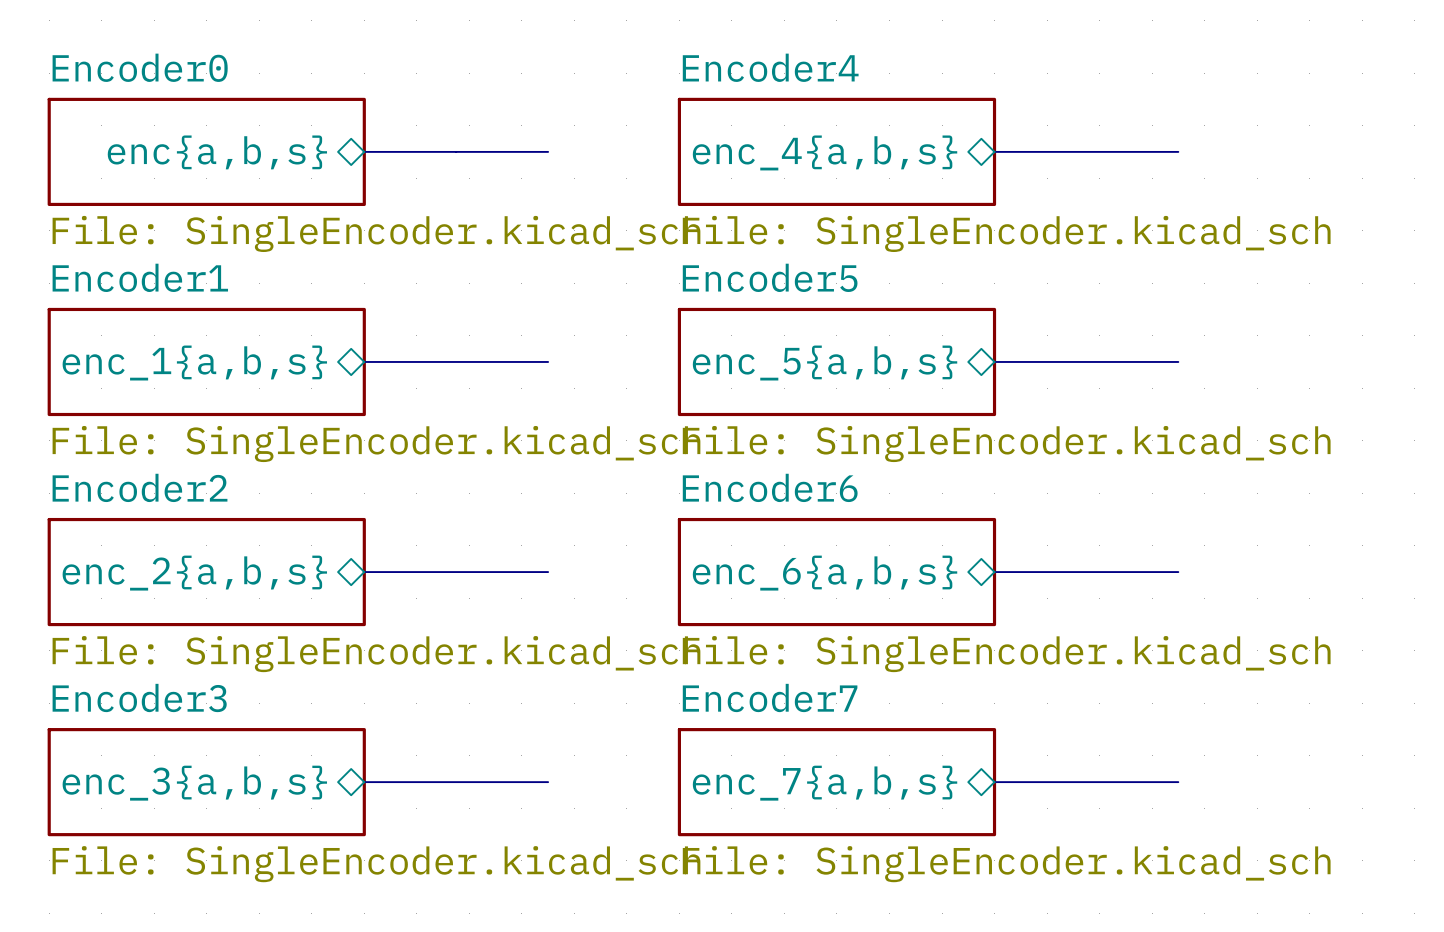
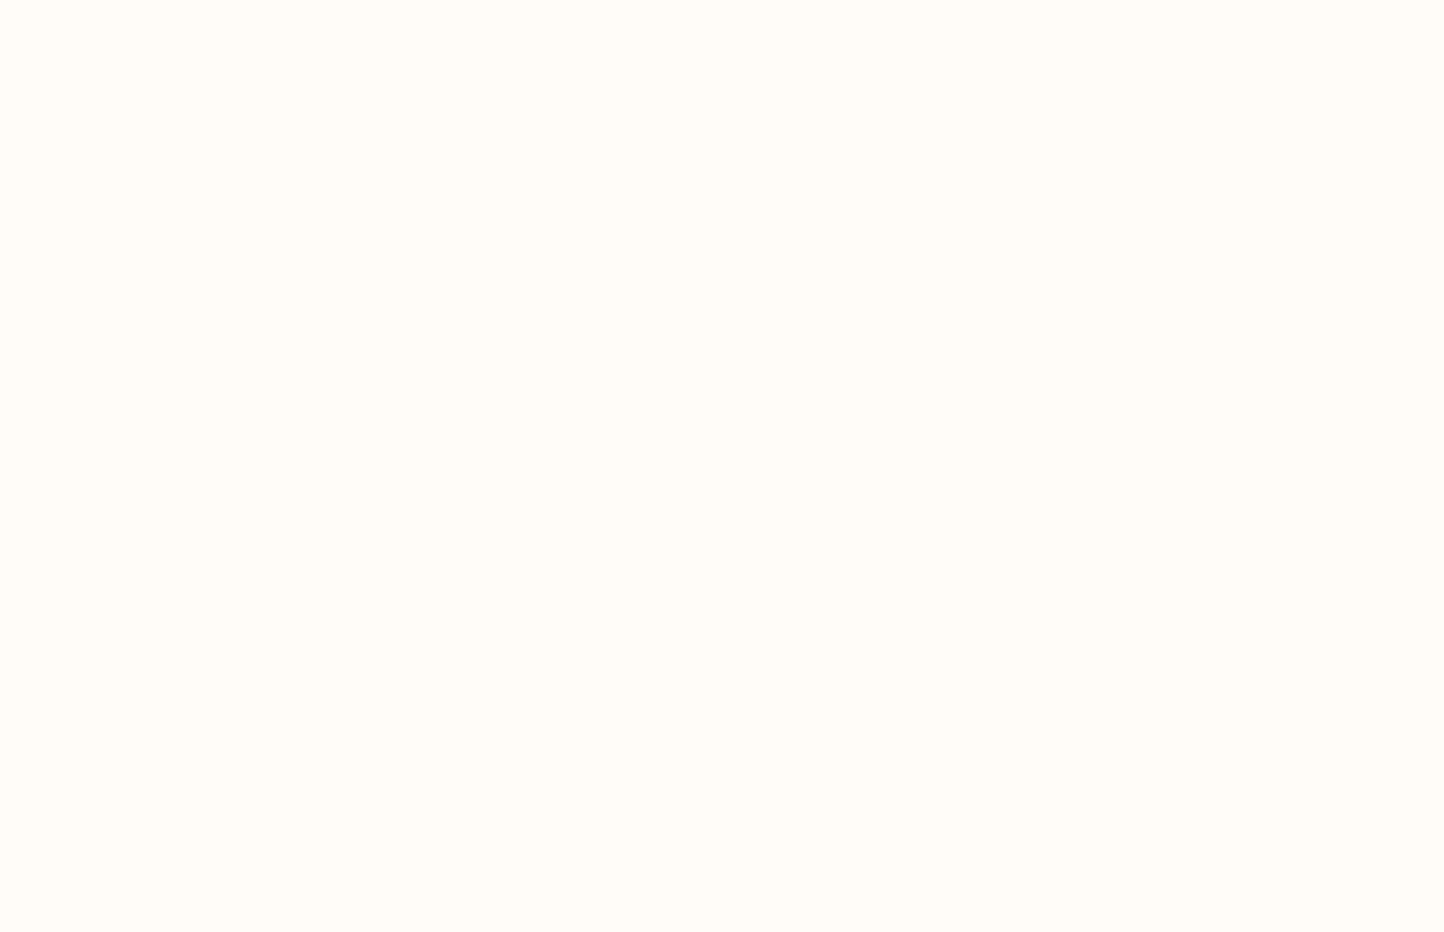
sheet Encoder0: File: SingleEncoder.kicad_sch (206, 151) -> none
bus: (364, 151) (548, 151) -> none
sheet Encoder4: File: SingleEncoder.kicad_sch (836, 151) -> none
bus: (994, 151) (1178, 151) -> none
sheet pin: enc{a,b,s} (217, 152) -> none
sheet pin: enc_4{a,b,s} (825, 152) -> none
sheet Encoder1: File: SingleEncoder.kicad_sch (206, 361) -> none
bus: (364, 361) (548, 361) -> none
sheet Encoder5: File: SingleEncoder.kicad_sch (836, 361) -> none
bus: (994, 361) (1178, 361) -> none
sheet pin: enc_1{a,b,s} (194, 363) -> none
sheet pin: enc_5{a,b,s} (825, 363) -> none
sheet Encoder2: File: SingleEncoder.kicad_sch (206, 572) -> none
bus: (364, 572) (548, 572) -> none
sheet Encoder6: File: SingleEncoder.kicad_sch (836, 572) -> none
bus: (994, 572) (1178, 572) -> none
sheet pin: enc_2{a,b,s} (194, 573) -> none
sheet pin: enc_6{a,b,s} (825, 573) -> none
sheet Encoder3: File: SingleEncoder.kicad_sch (206, 782) -> none
bus: (364, 782) (548, 782) -> none
sheet Encoder7: File: SingleEncoder.kicad_sch (836, 782) -> none
bus: (994, 782) (1178, 782) -> none
sheet pin: enc_3{a,b,s} (194, 783) -> none
sheet pin: enc_7{a,b,s} (825, 783) -> none

